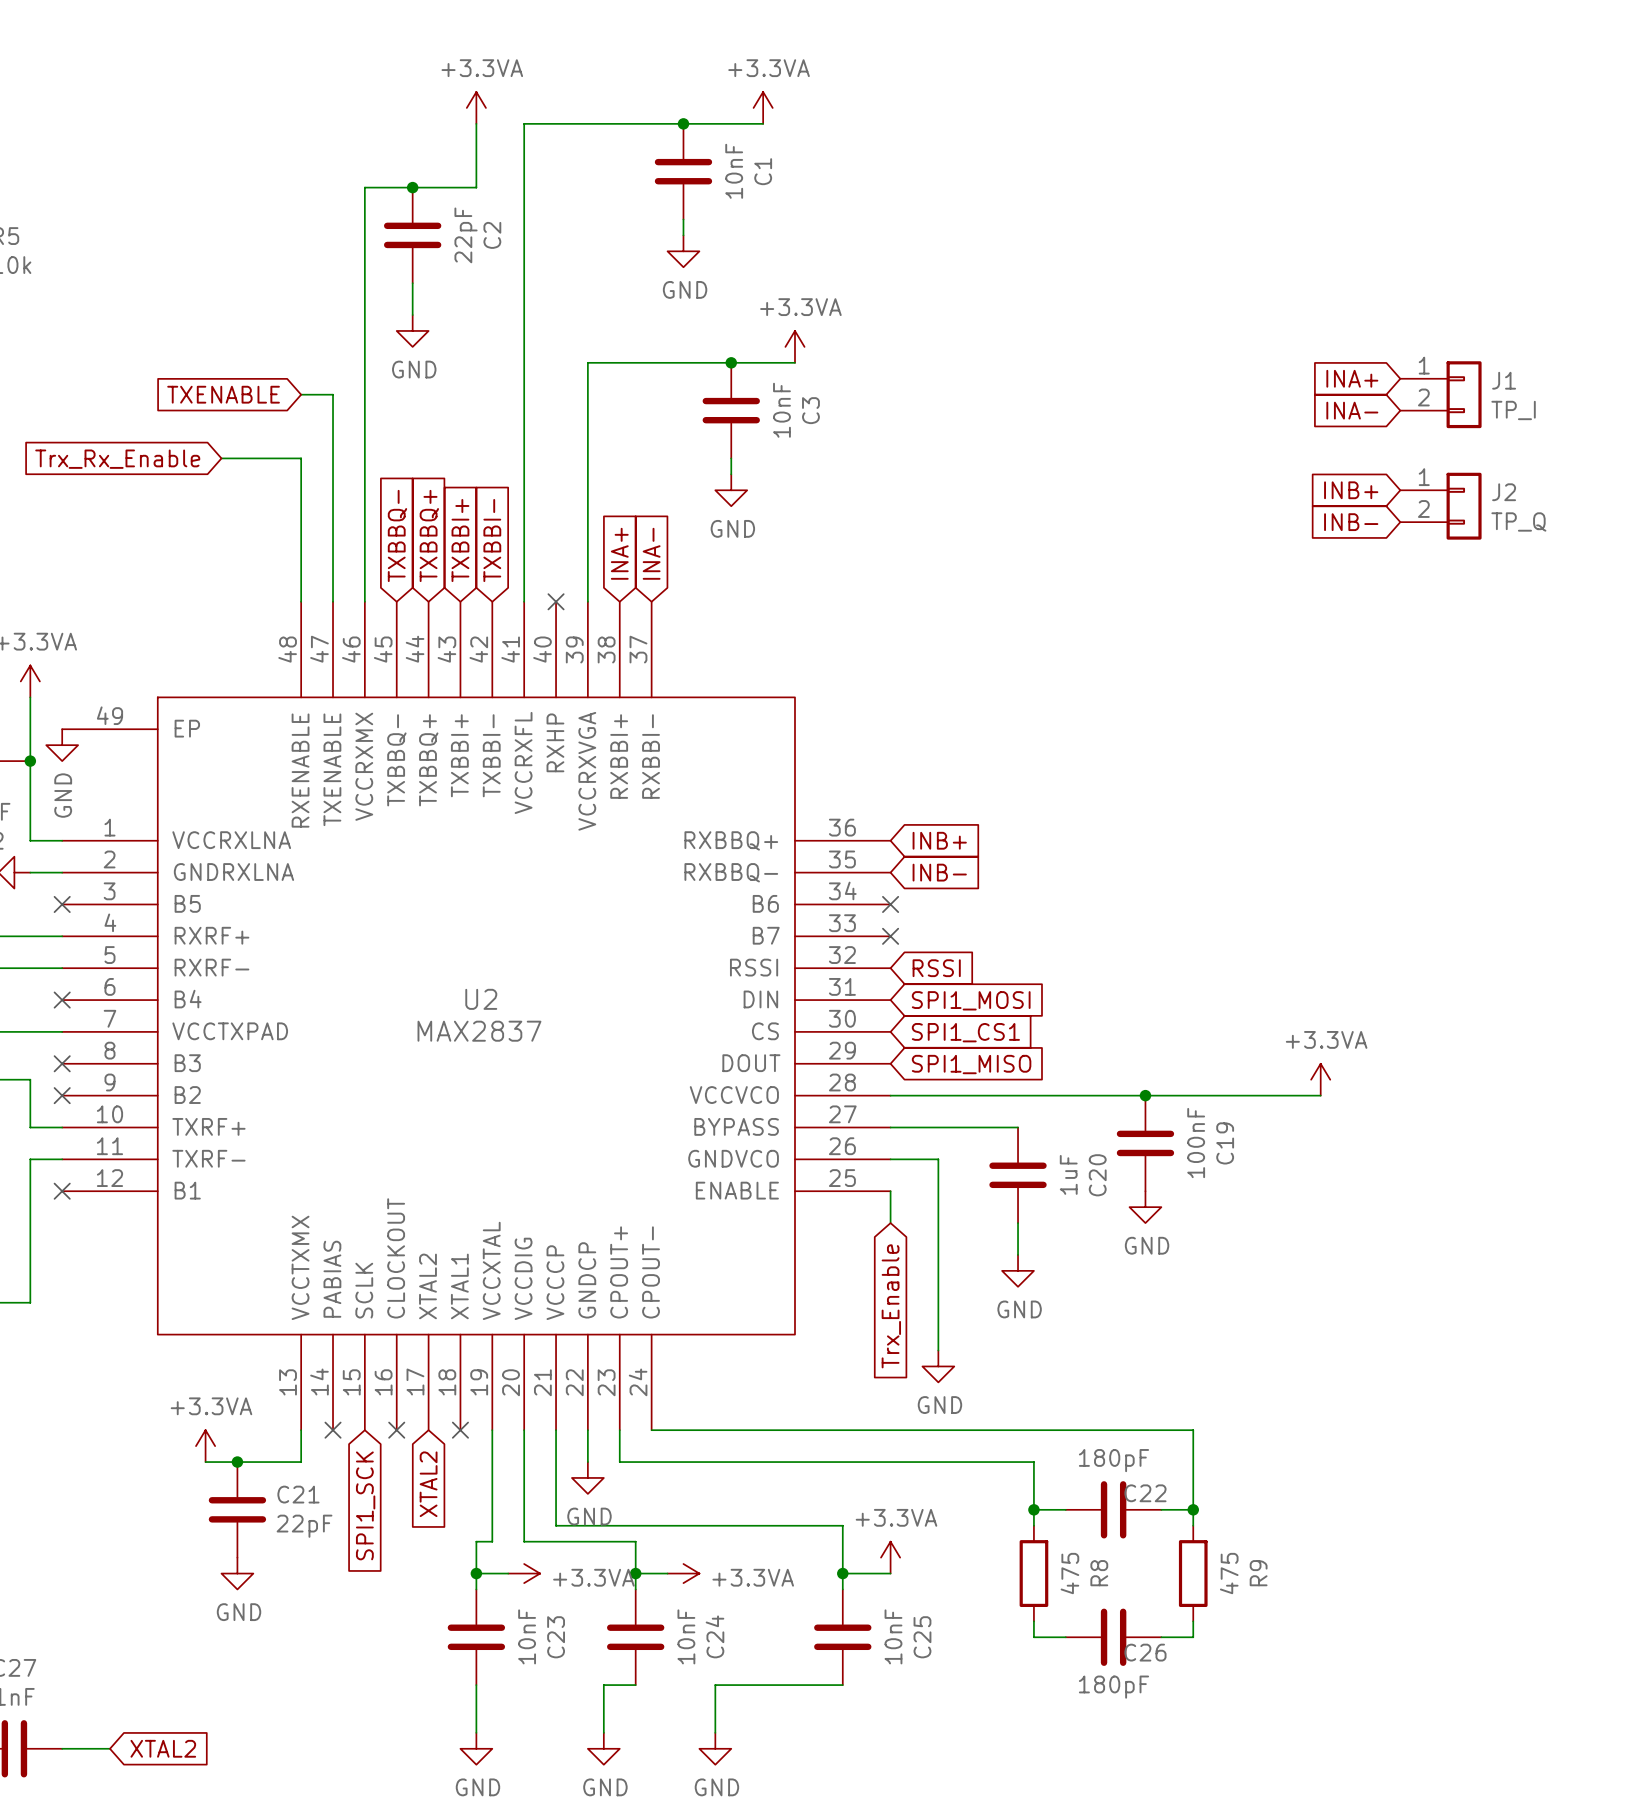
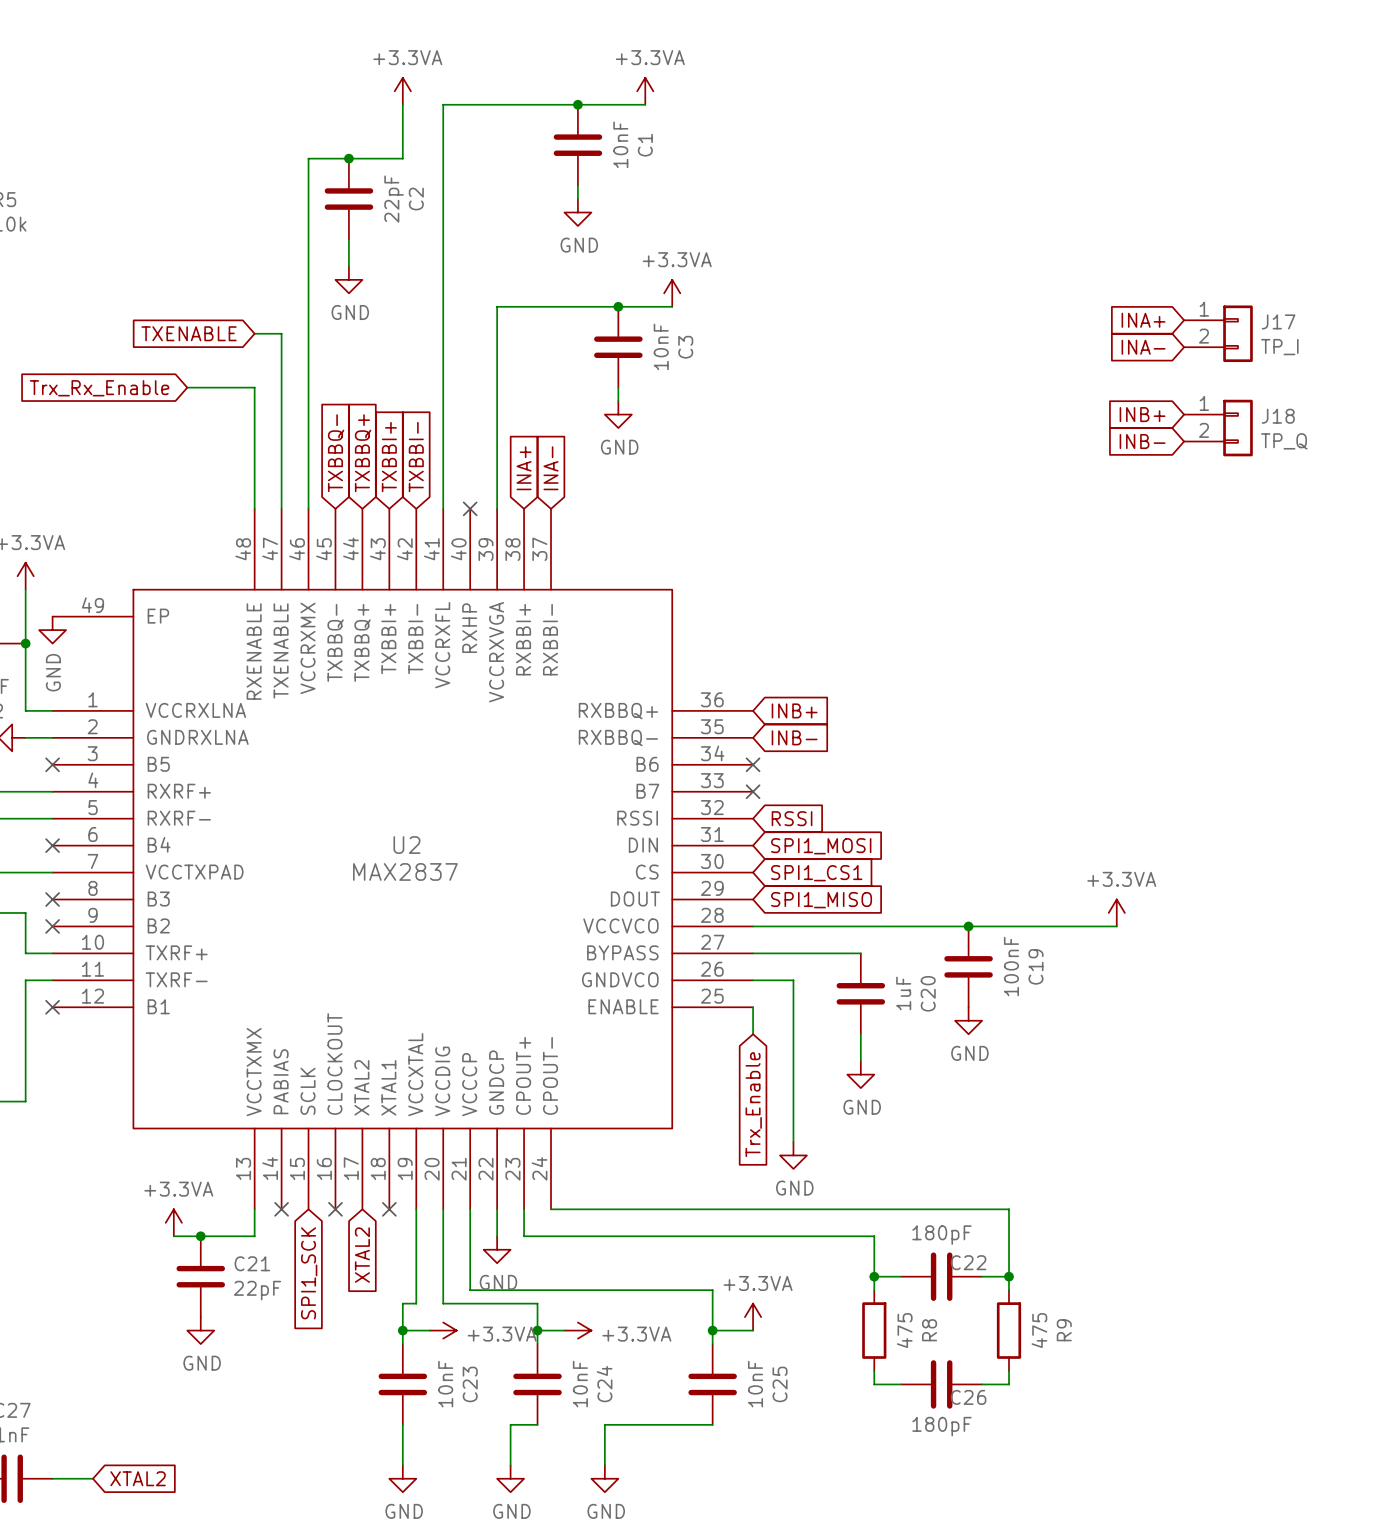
J1 name: J1 (1504, 380) -> J17 (1278, 321)
J2 name: J2 (1504, 492) -> J18 (1278, 416)

